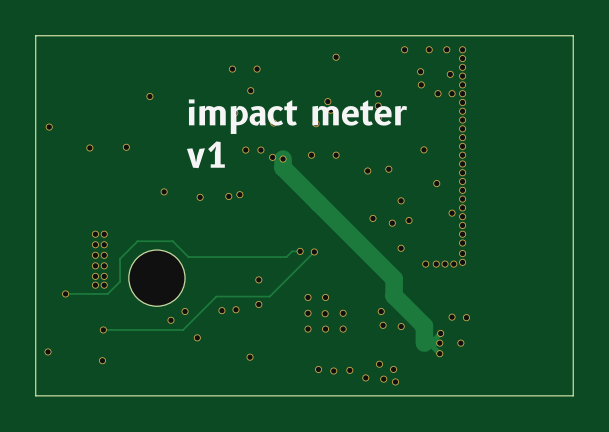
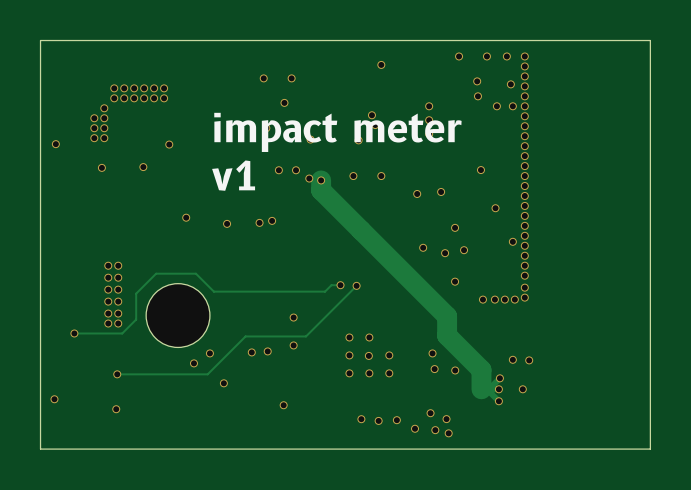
via: none -> (114, 88)
via: none -> (124, 88)
via: none -> (134, 88)
via: none -> (144, 88)
via: none -> (154, 88)
via: none -> (164, 88)
via: none -> (114, 98)
via: none -> (124, 98)
via: none -> (134, 98)
via: none -> (144, 98)
via: none -> (154, 98)
via: none -> (164, 98)
via: none -> (104, 108)
via: (149, 96) -> none
via: none -> (94, 118)
via: none -> (104, 118)
via: none -> (94, 128)
via: none -> (104, 128)
via: none -> (94, 138)
via: none -> (104, 138)
via: none -> (169, 144)

